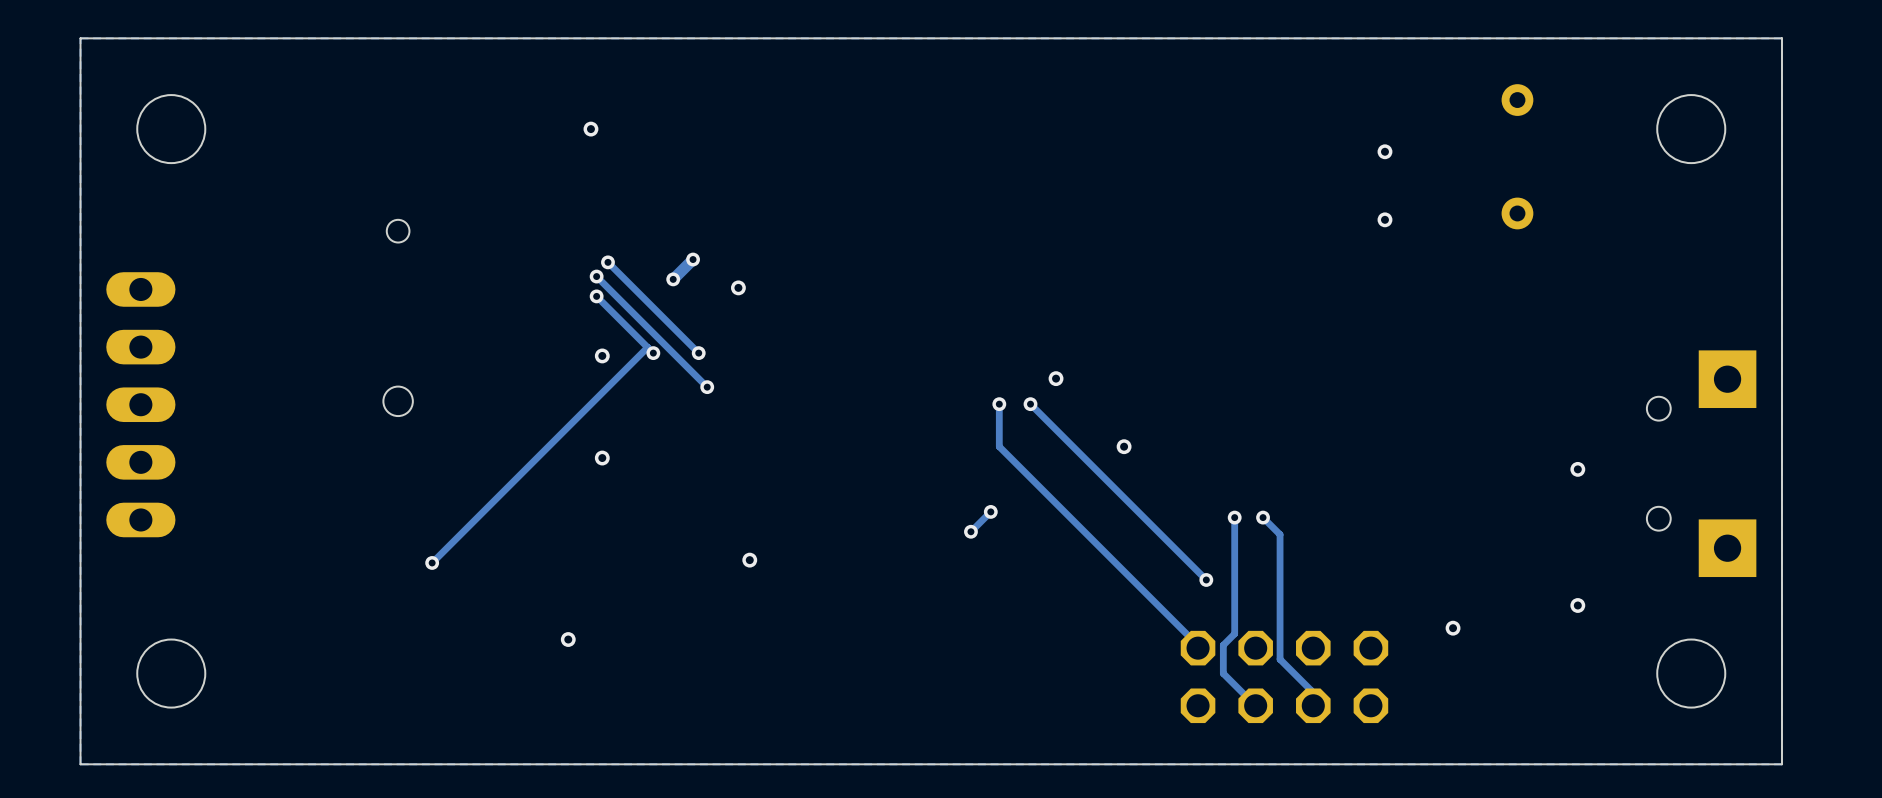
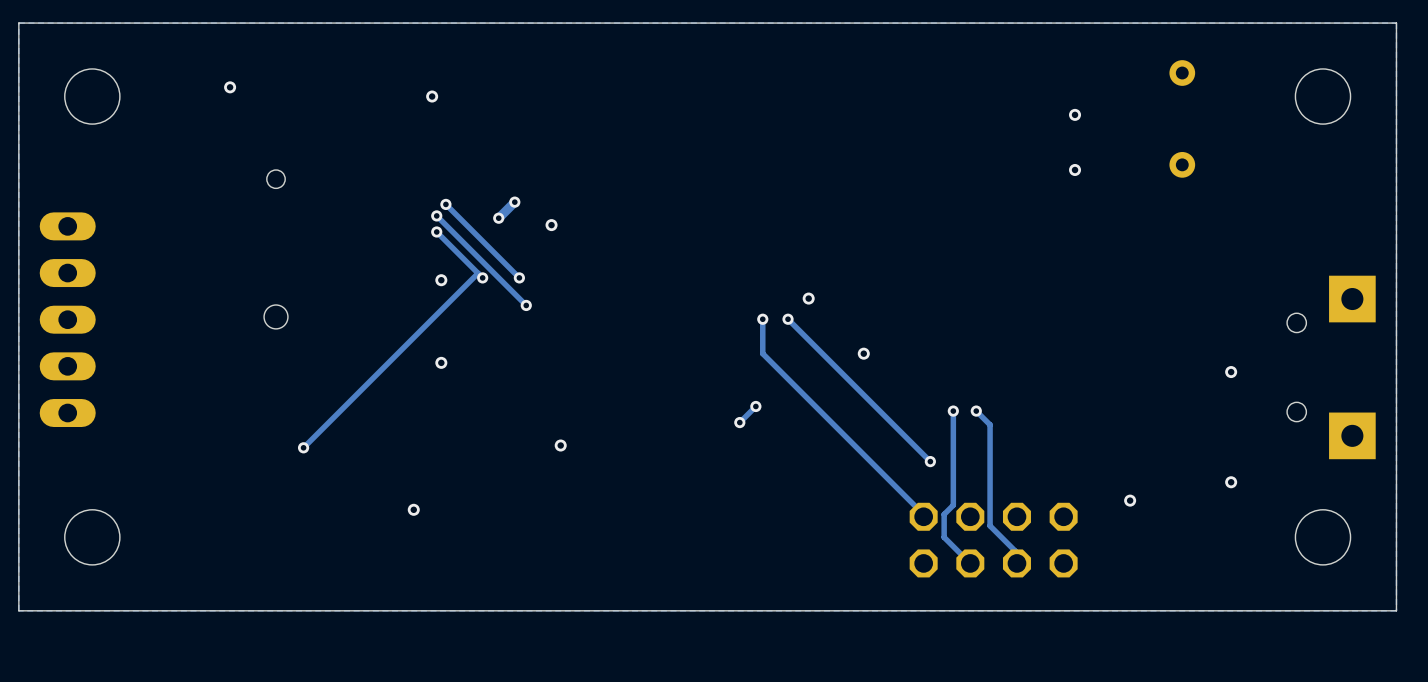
via: none -> (230, 87)

